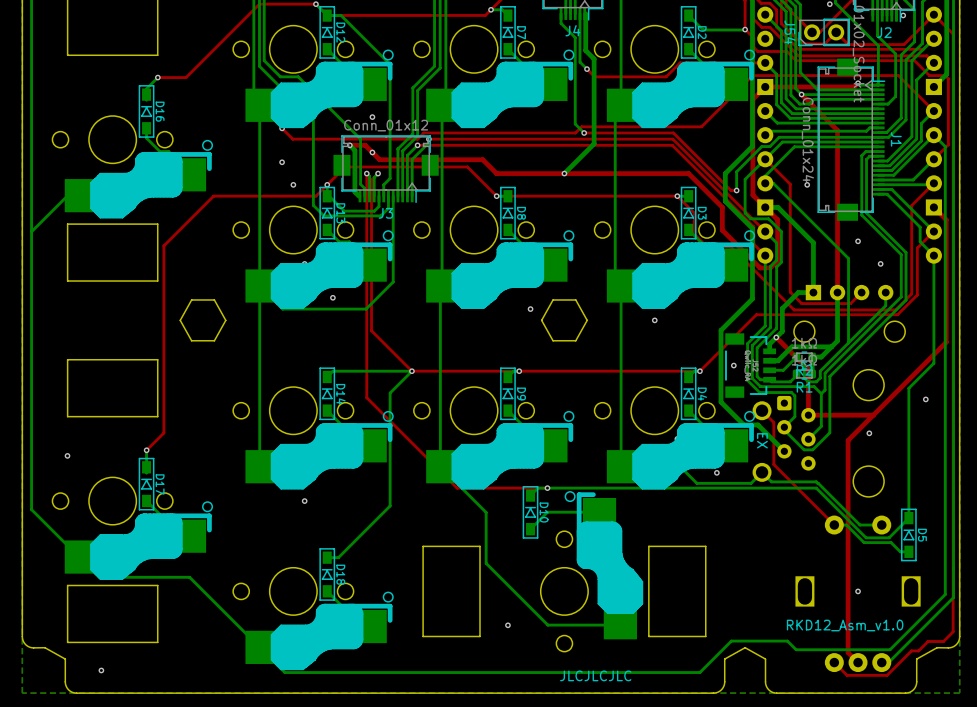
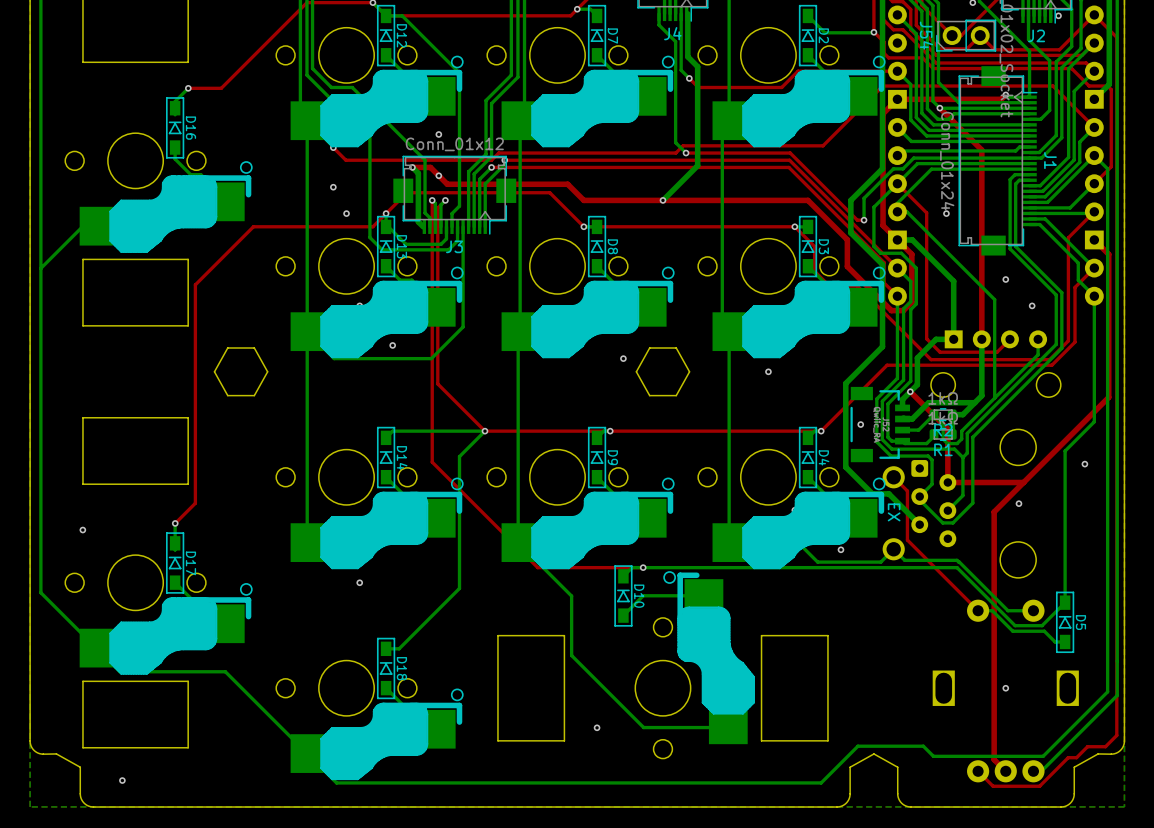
text: RKD12_Asm_v1.0 (845, 625) -> none
text: JLCJLCJLC (595, 675) -> none

